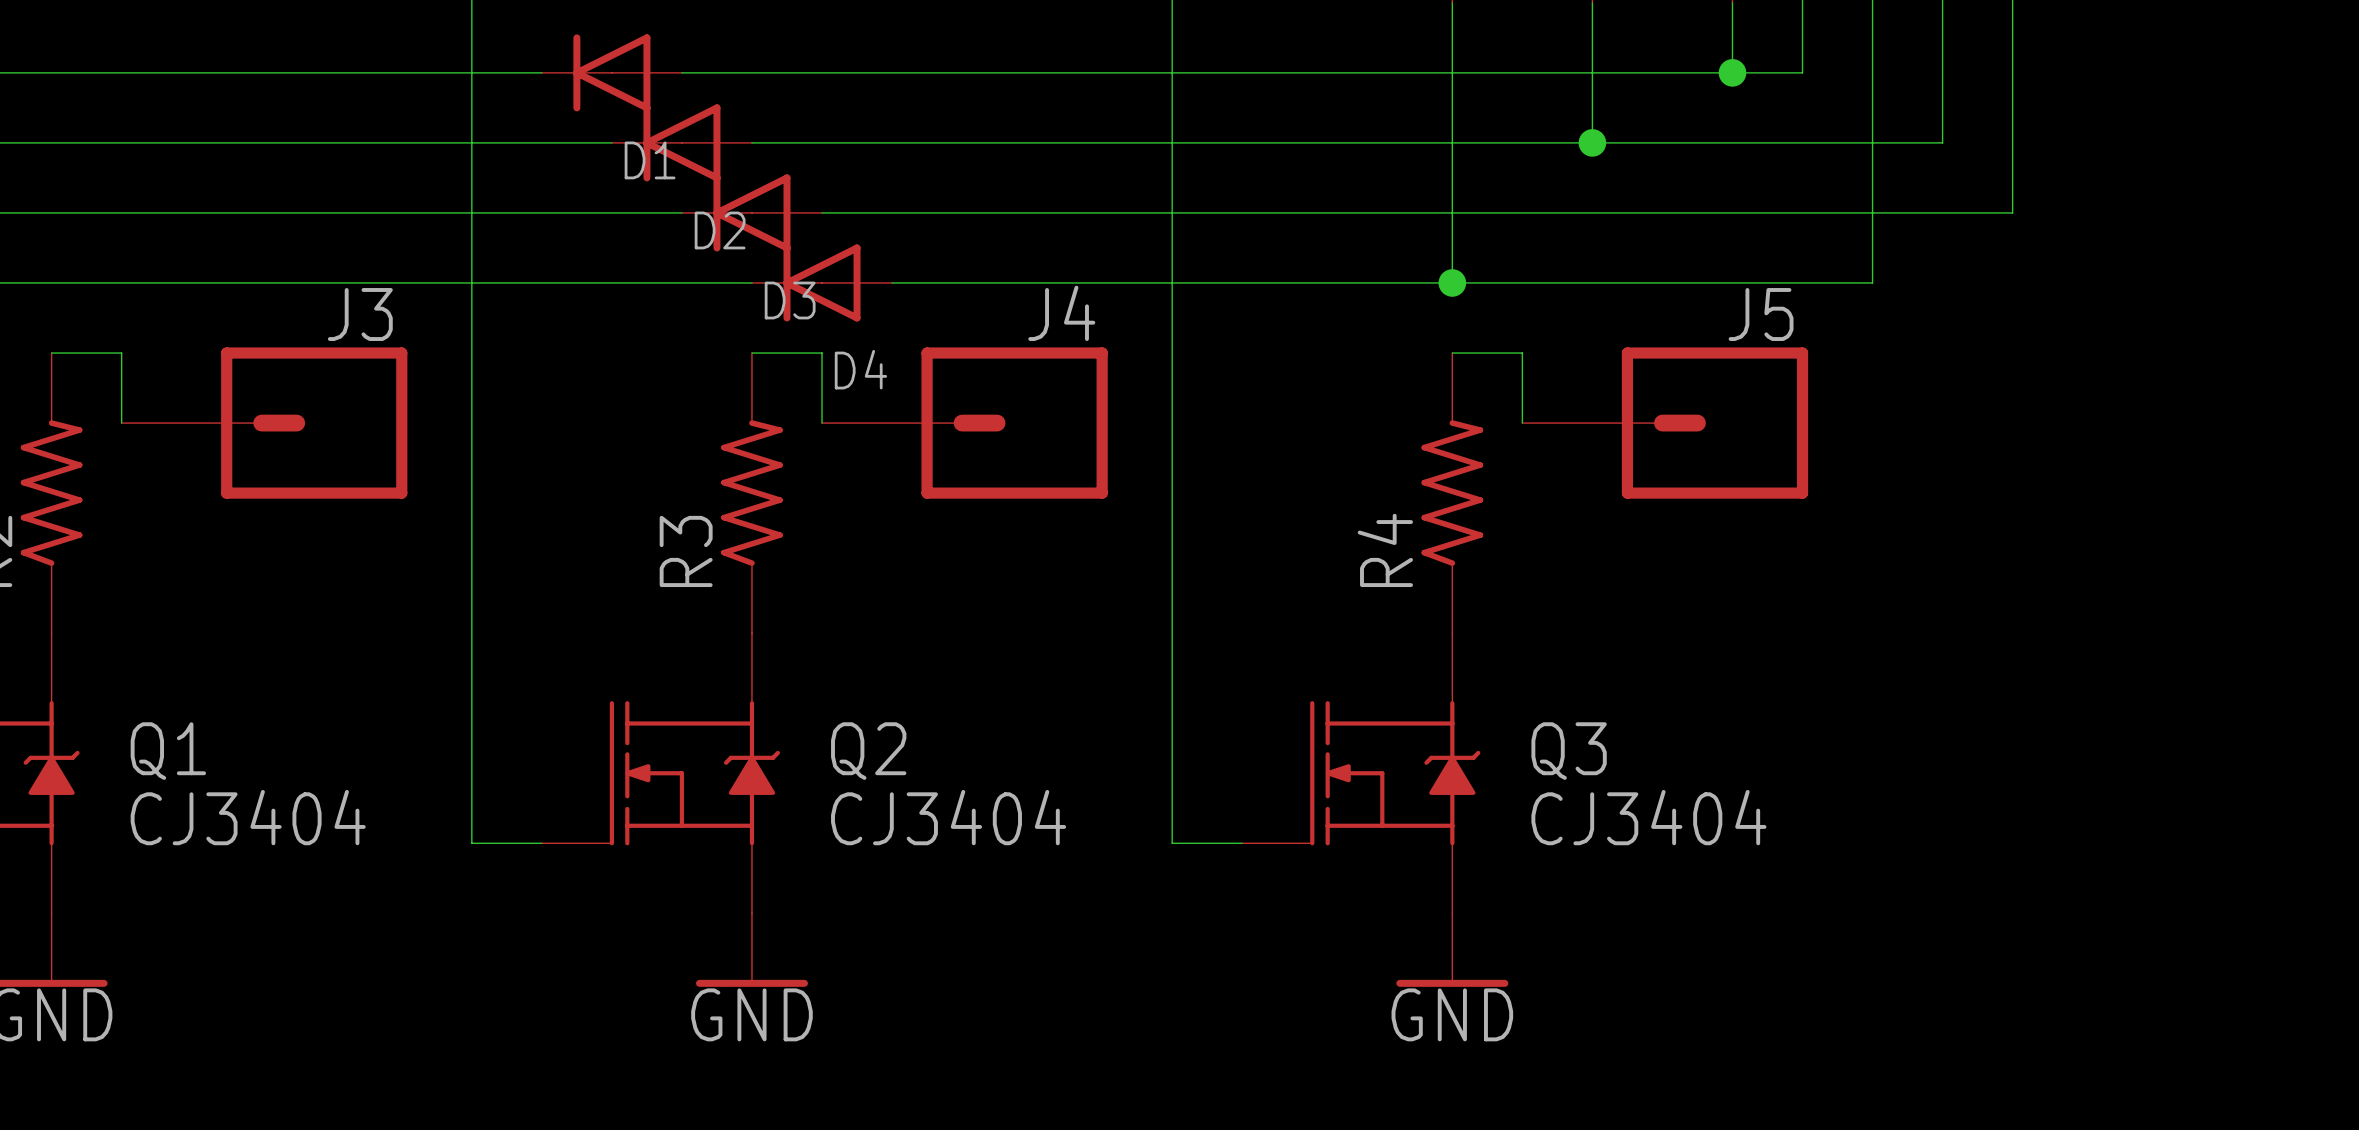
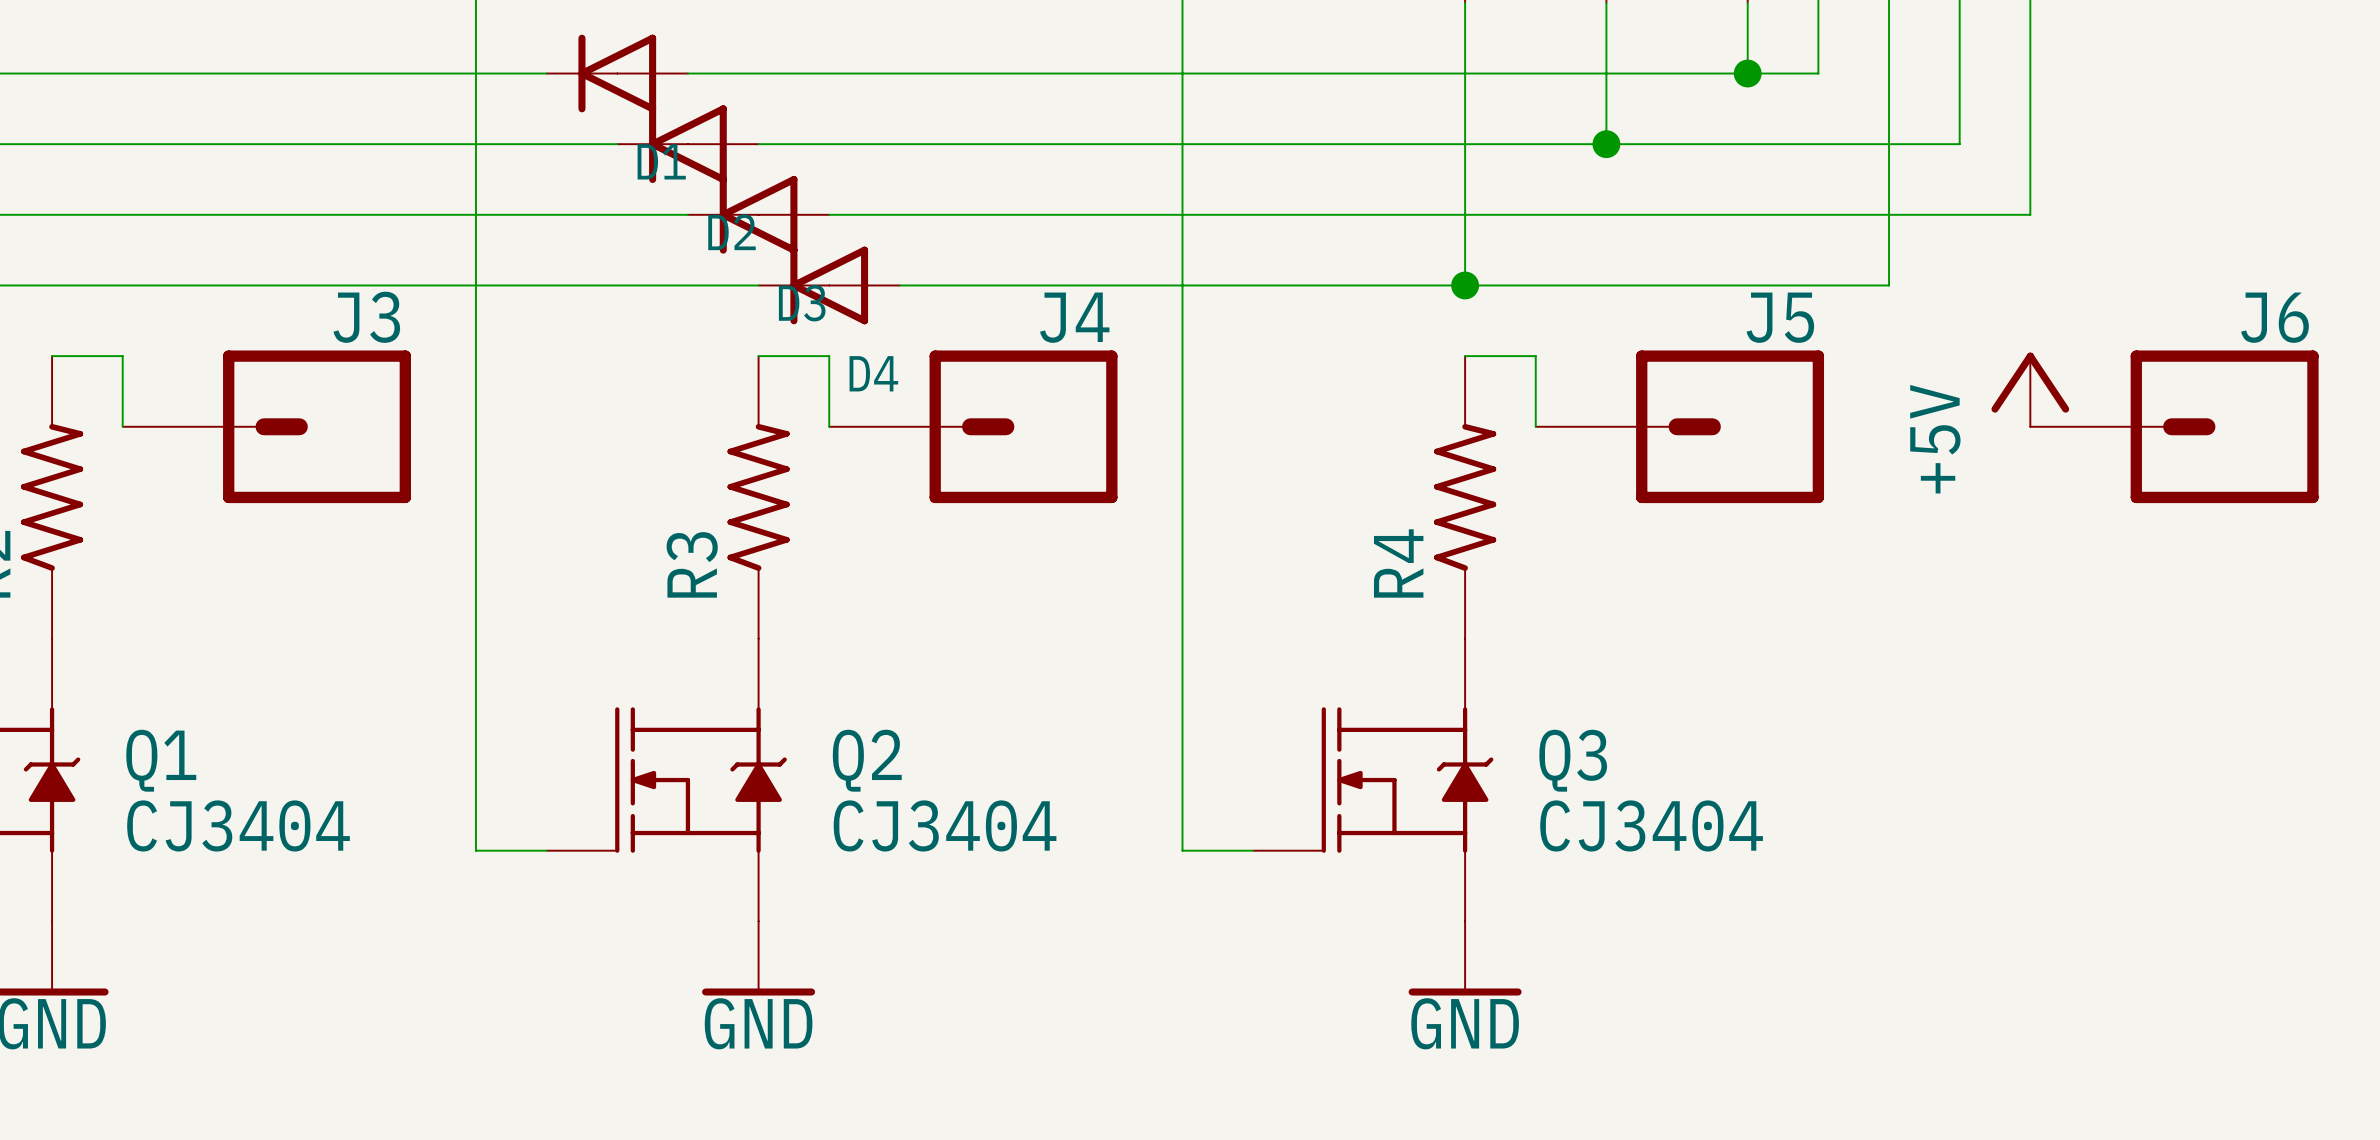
power symbol: none -> +5V (2030, 389)
J6: none -> (2174, 426)

